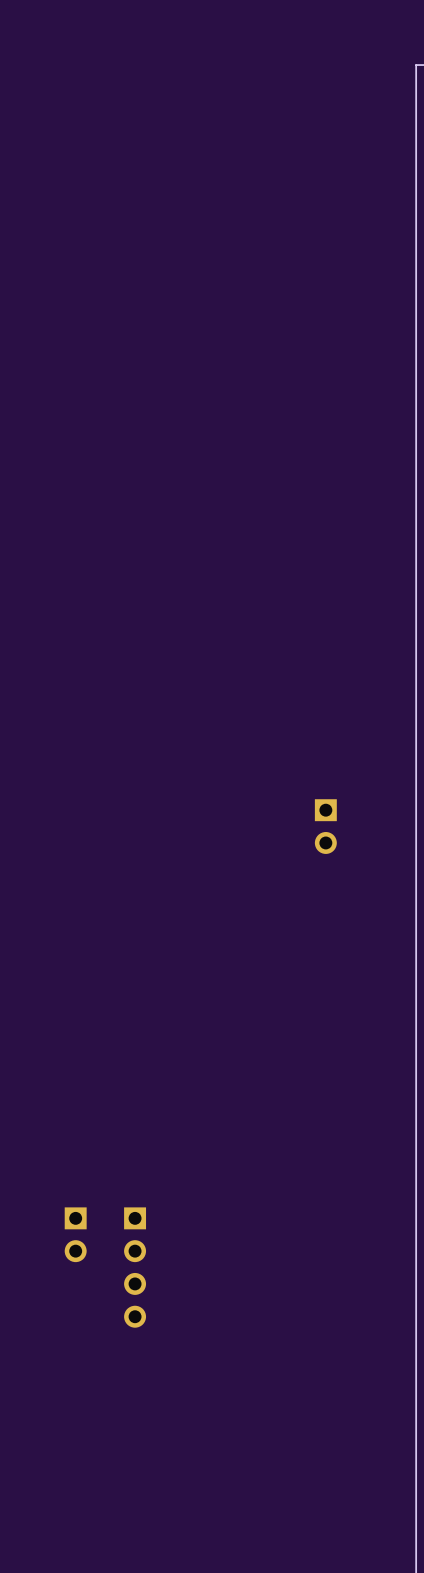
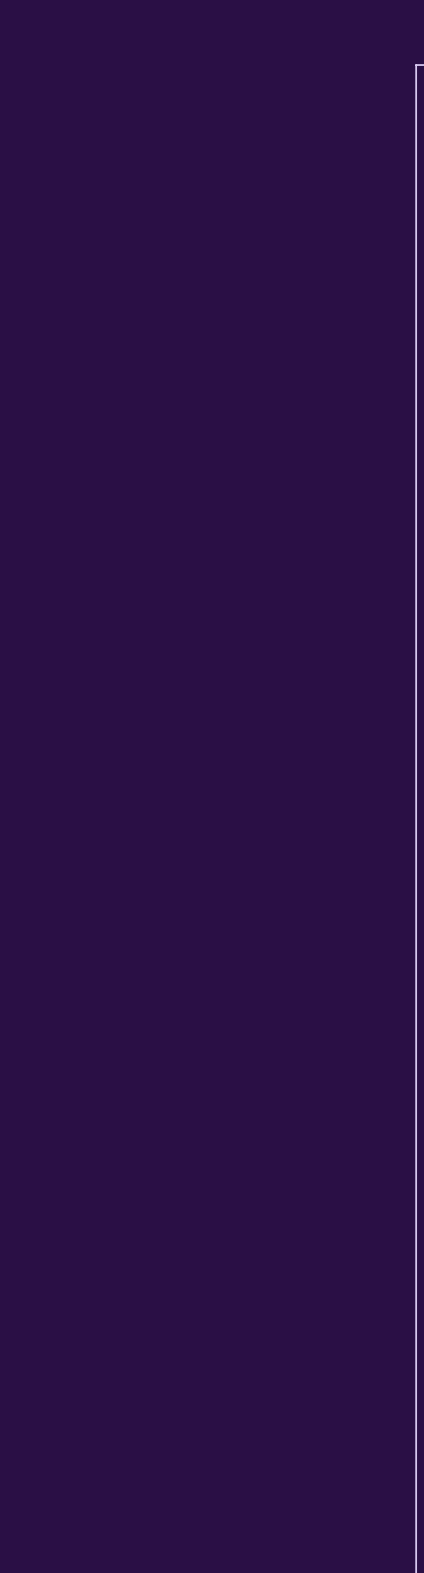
part: (325, 826) -> none
part: (75, 1234) -> none
part: (135, 1267) -> none

